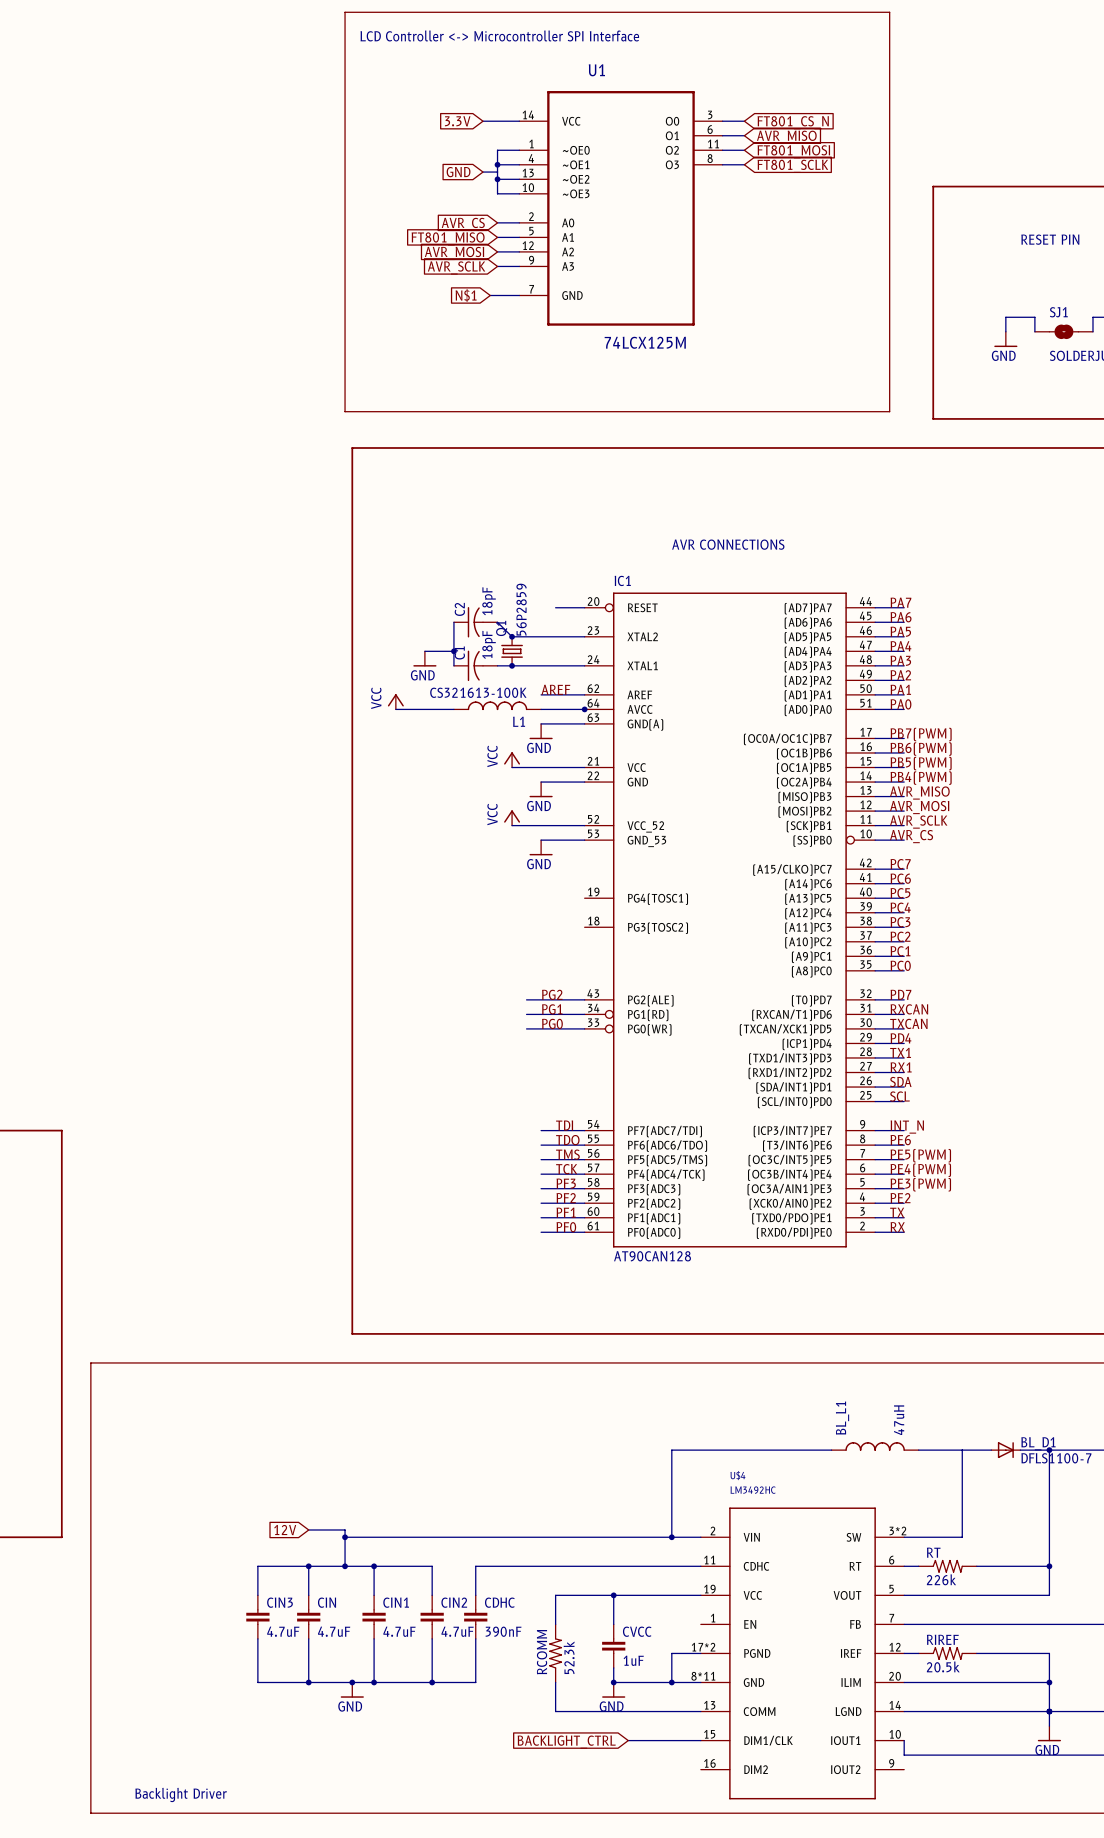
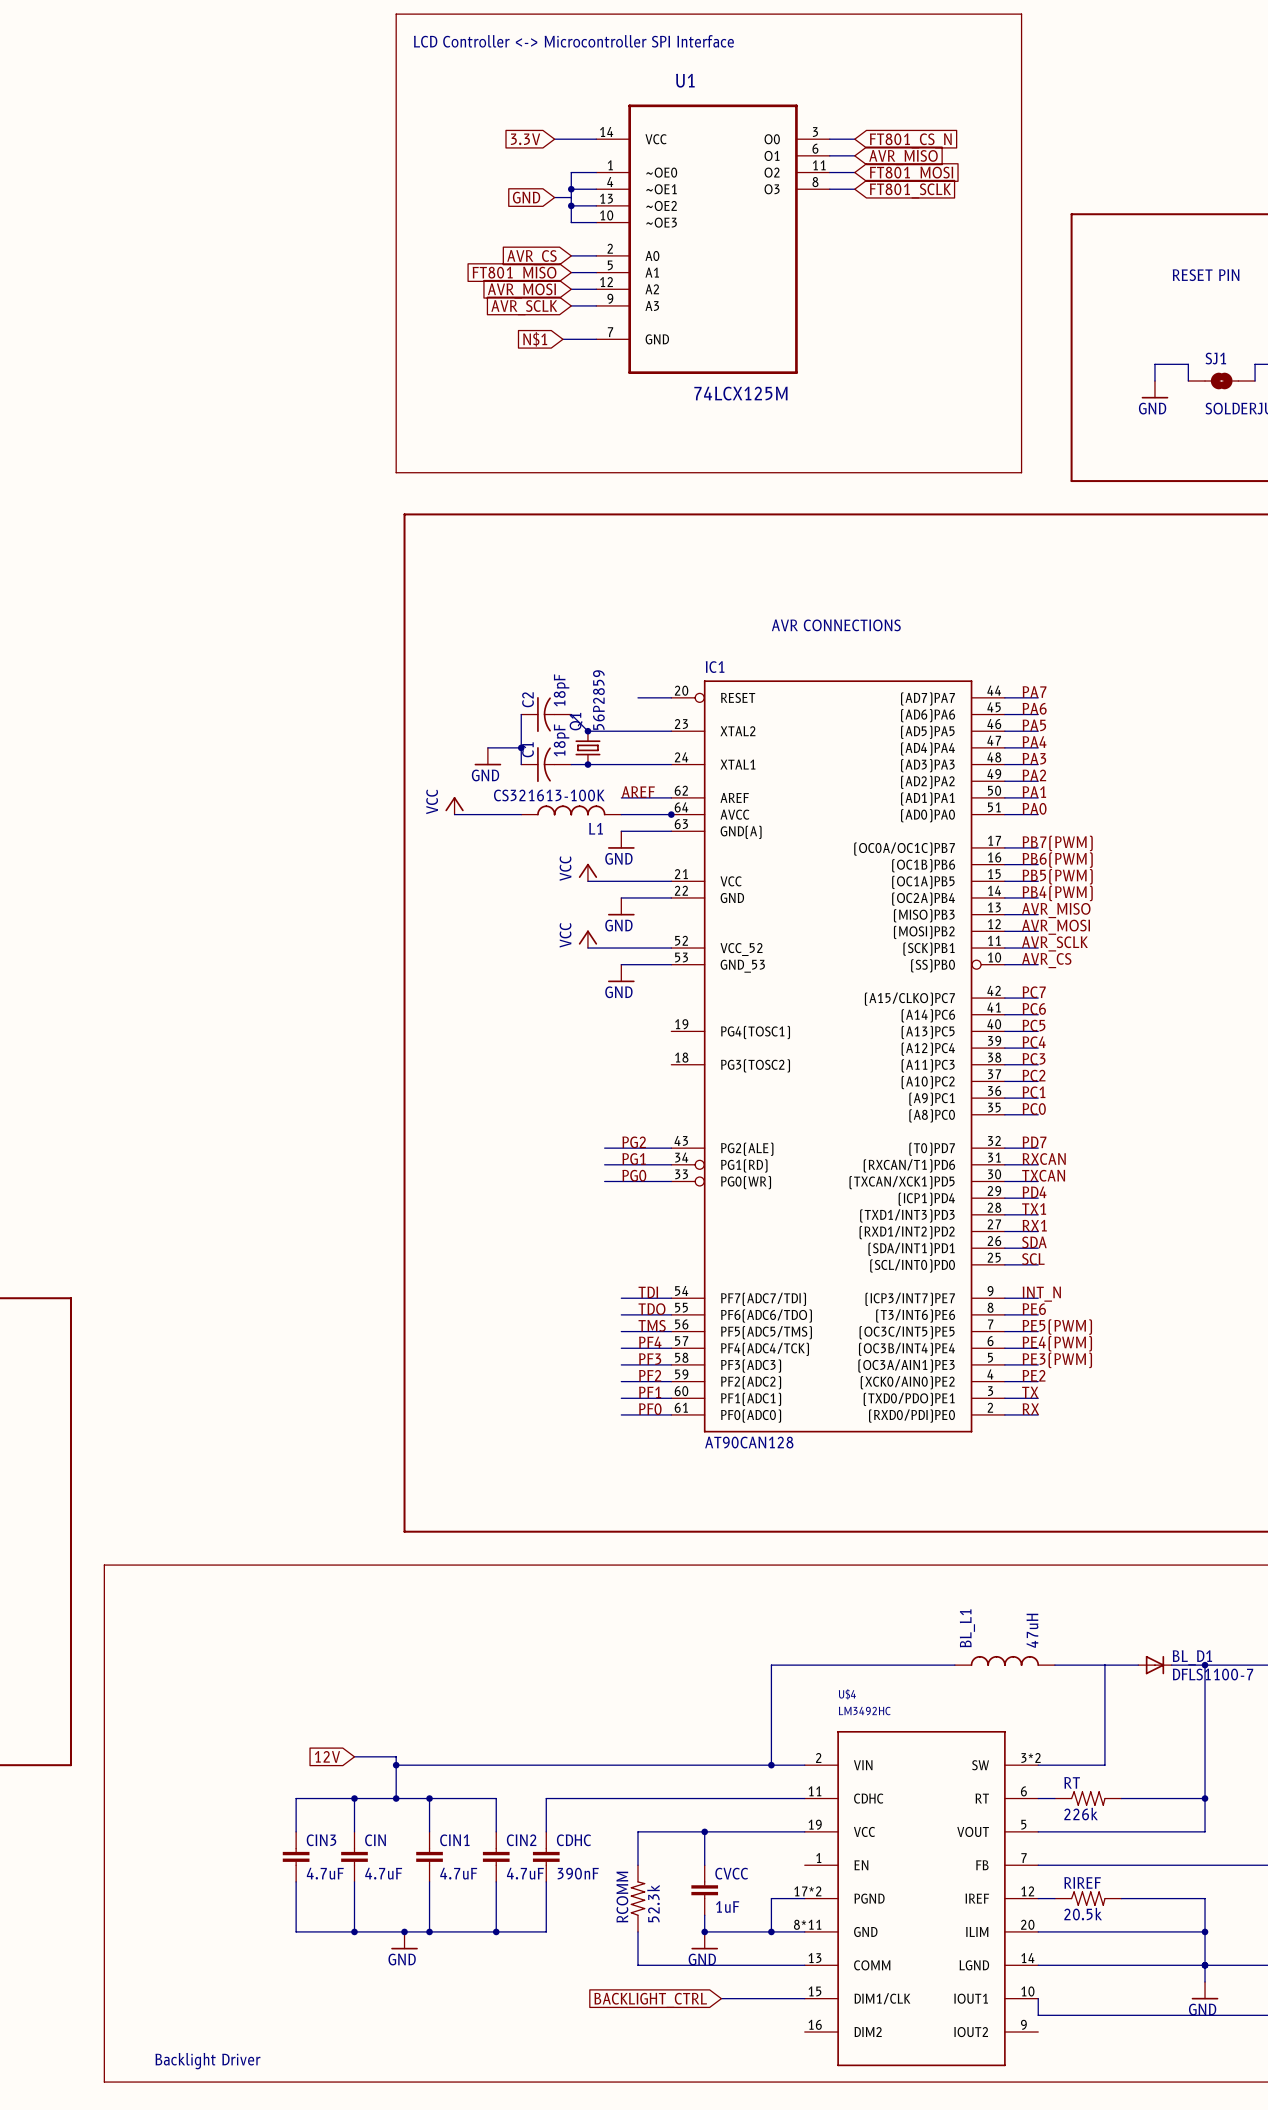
label: TCK (566, 1169) -> PF4 (650, 1342)

